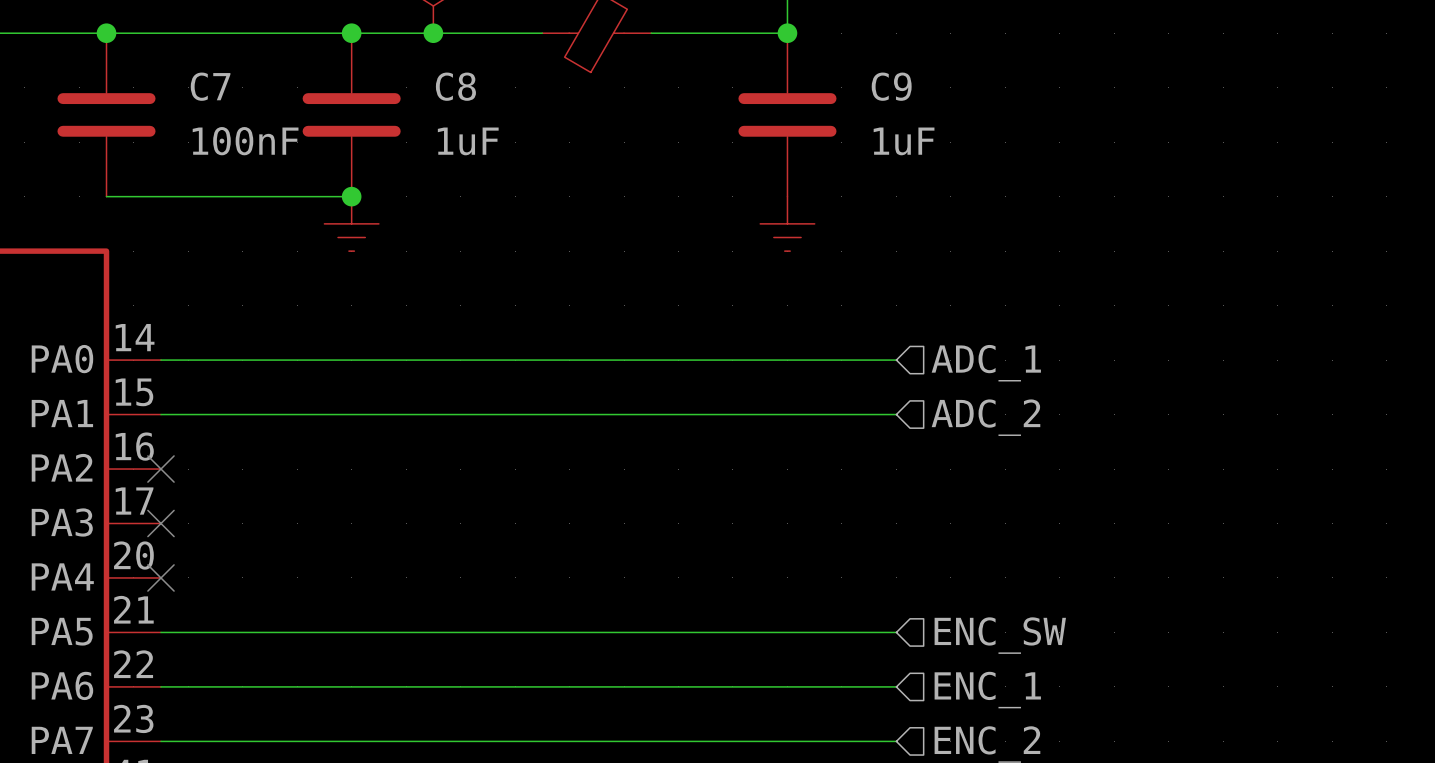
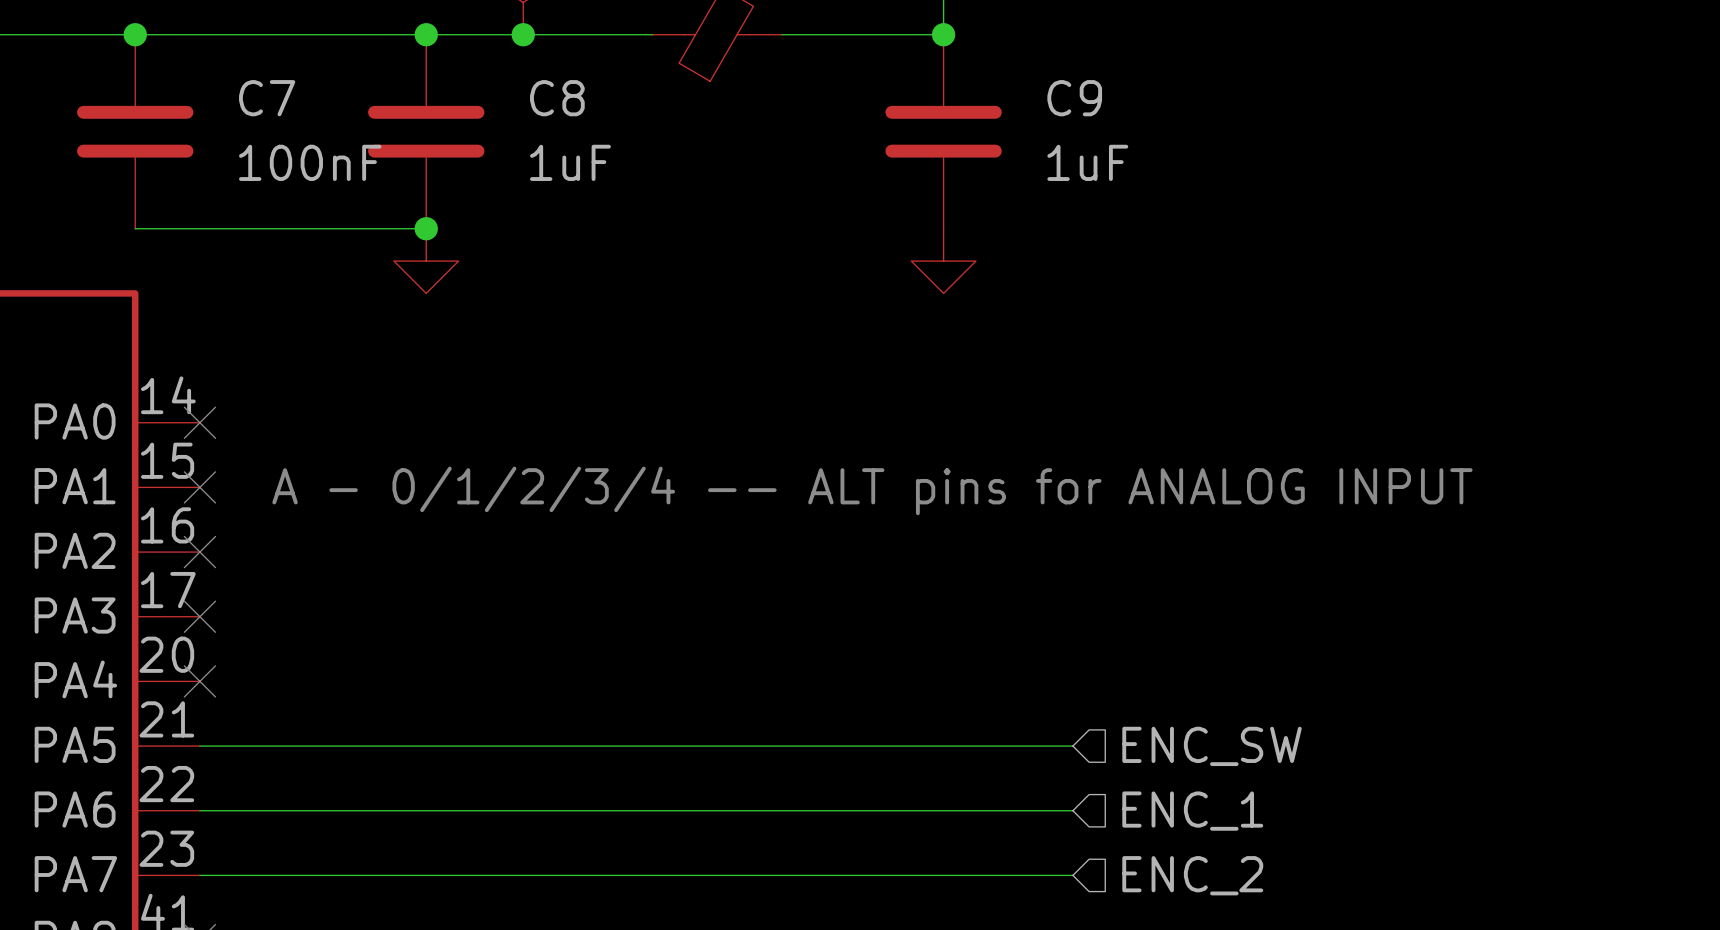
power symbol shape: [324, 196, 379, 252] -> [393, 228, 459, 294]
power symbol shape: [760, 196, 815, 252] -> [911, 228, 976, 294]
wire: (160, 360) (896, 360) -> none
no-connect mark: none -> (199, 422)
hierarchical label: ADC_1 (986, 363) -> none
wire: (160, 414) (896, 414) -> none
no-connect mark: none -> (199, 487)
text: none -> A - 0/1/2/3/4 -- ALT pins for ANALOG INPUT (872, 490)
hierarchical label: ADC_2 (985, 417) -> none

